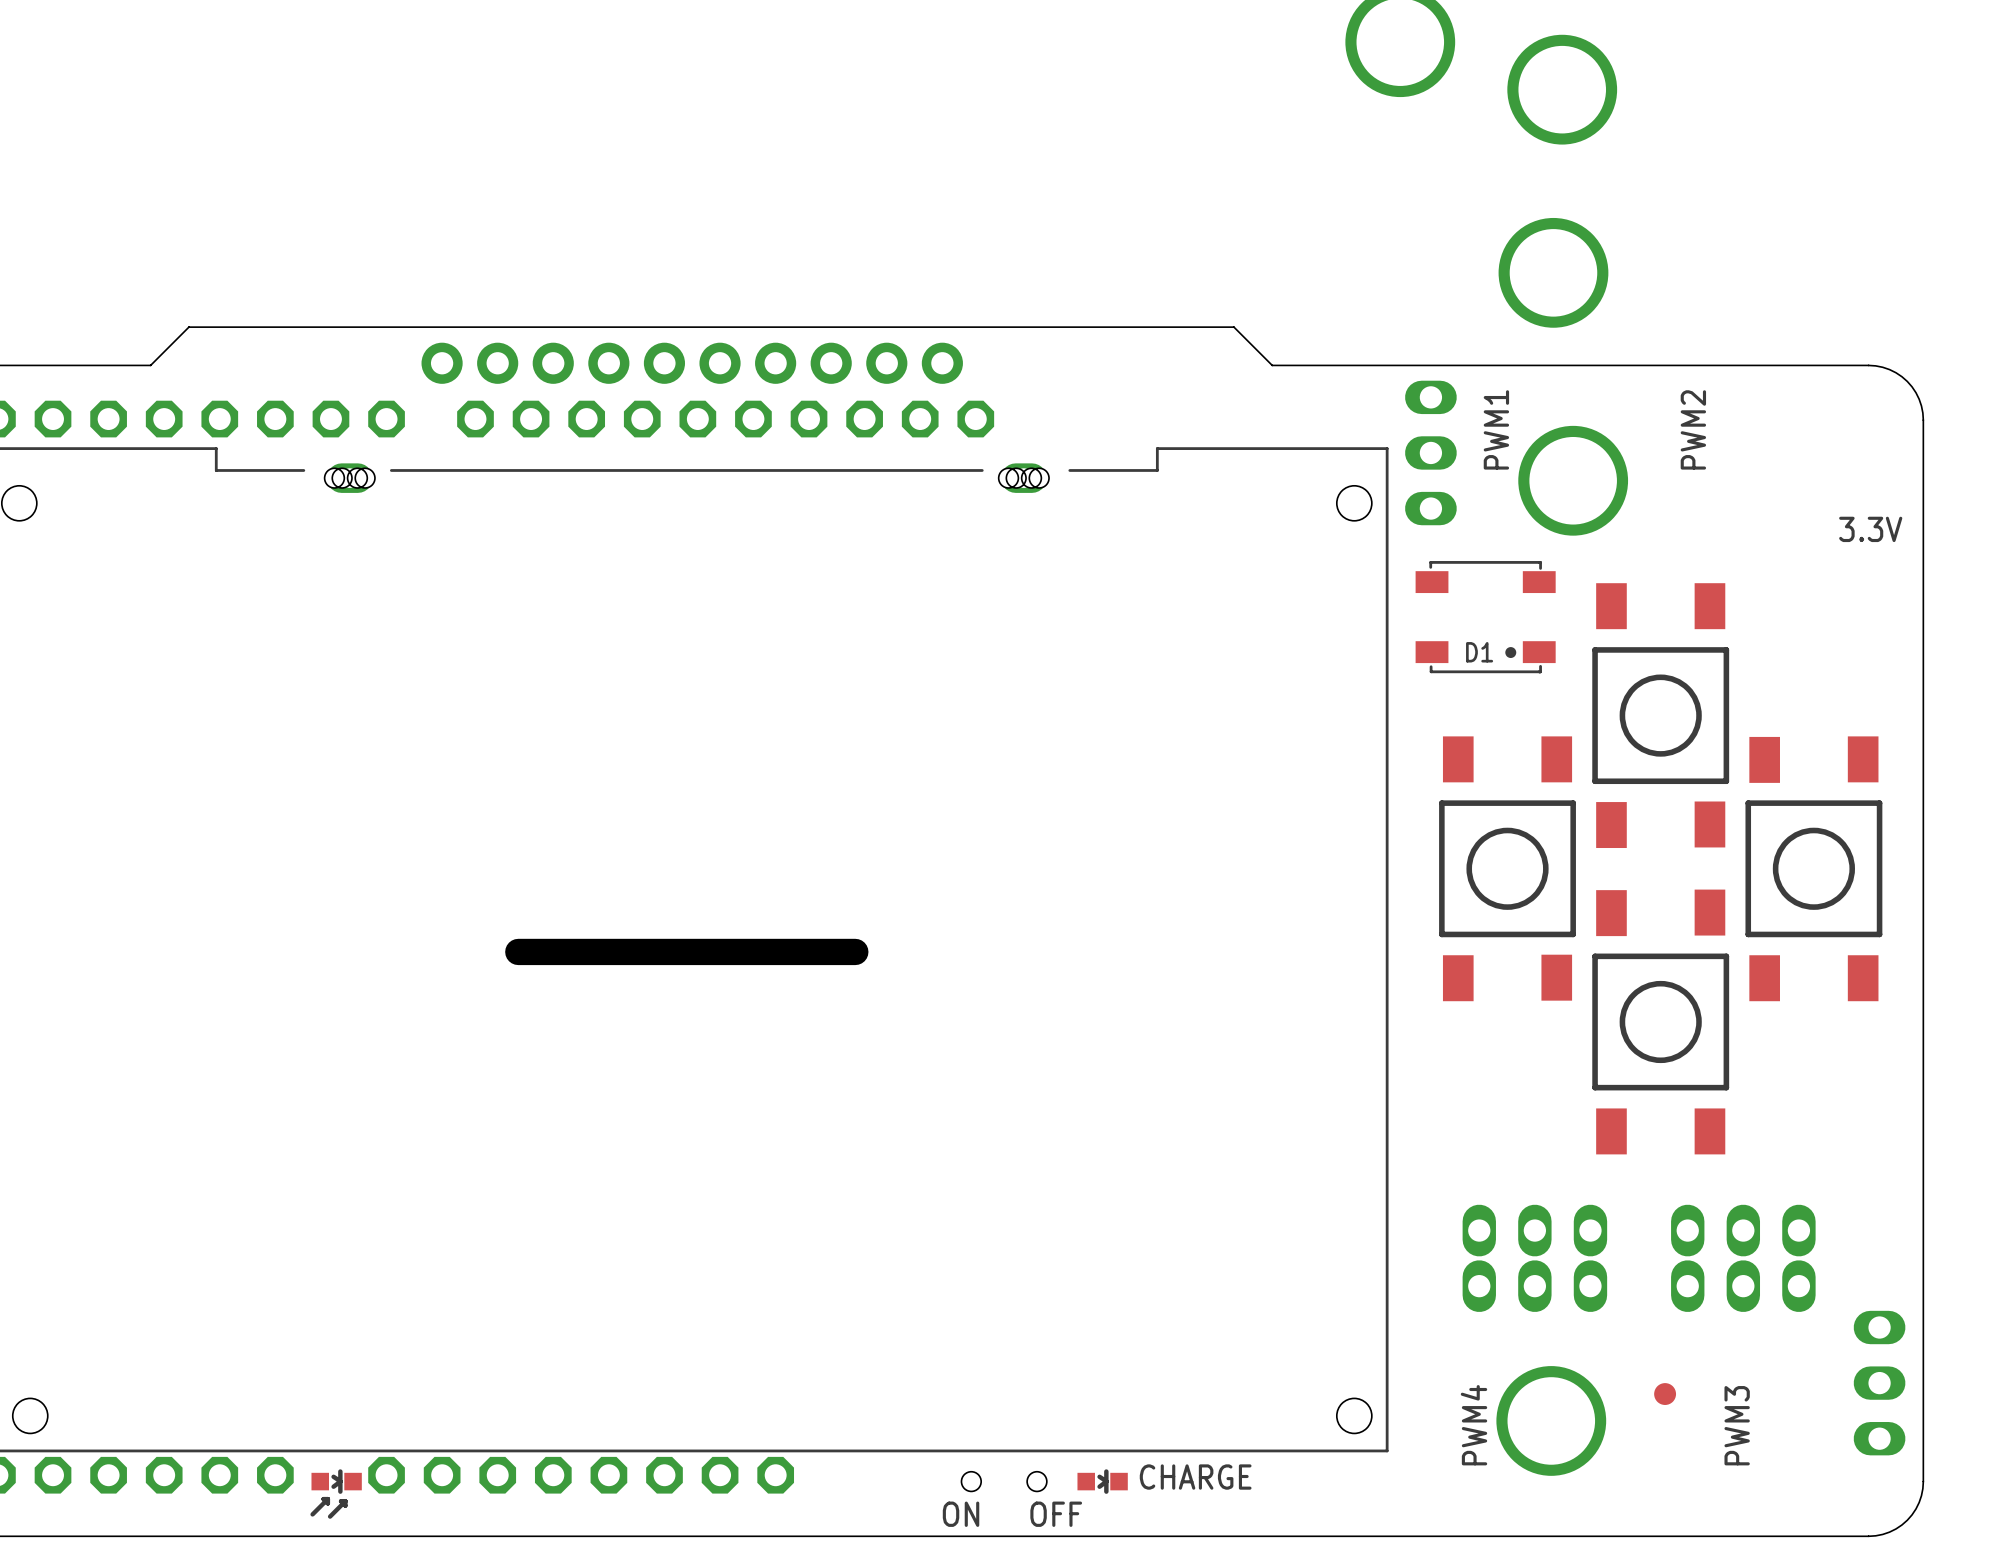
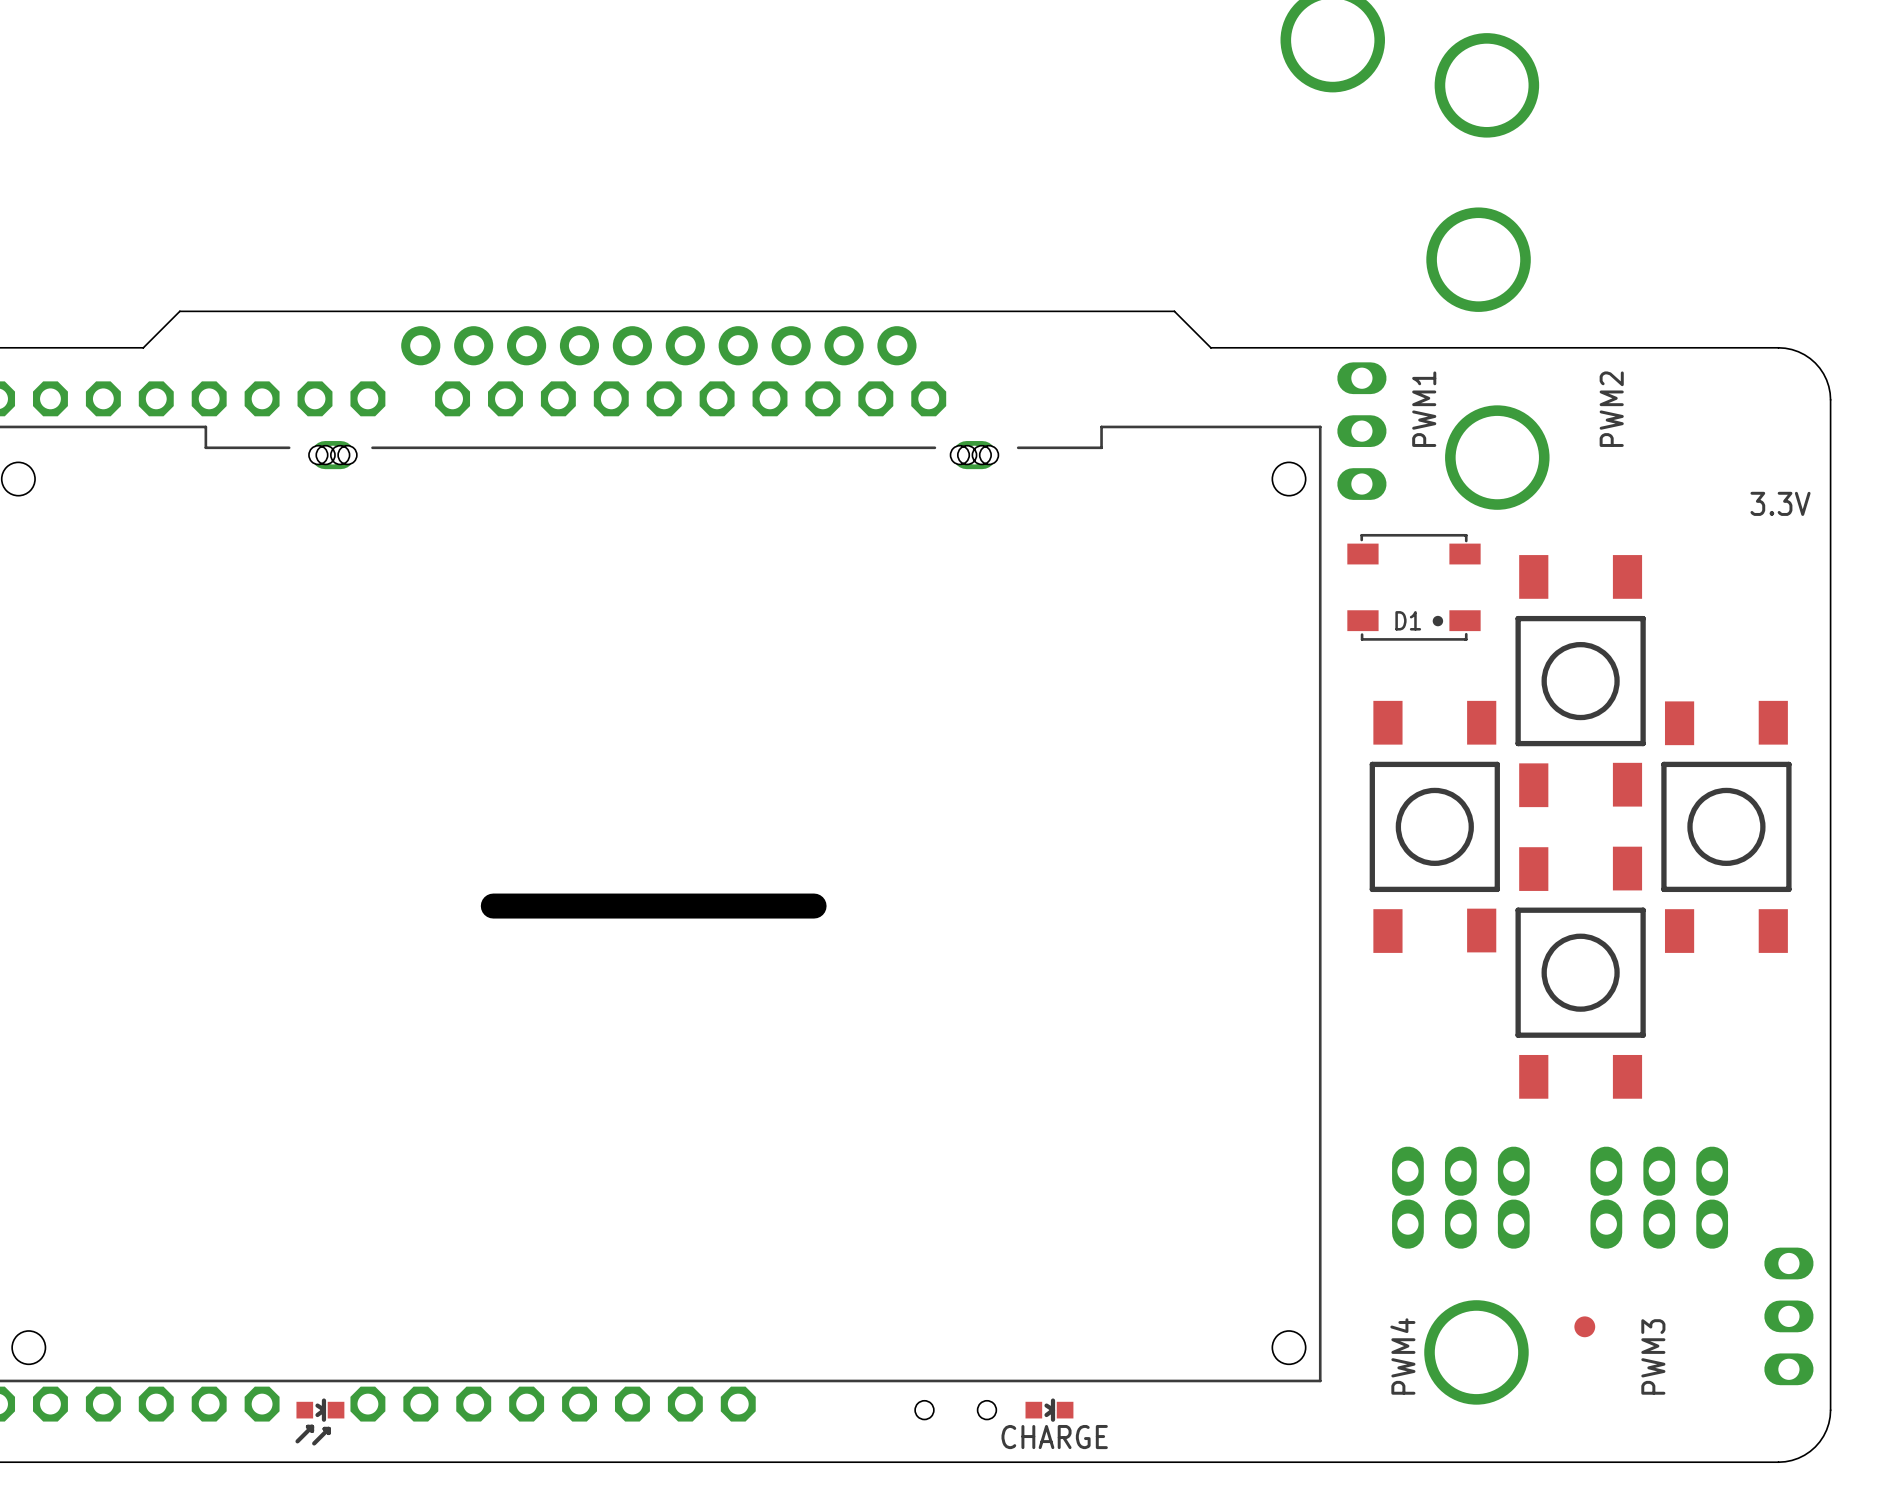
text position: CHARGE (1195, 1477) -> CHARGE (1054, 1437)
text: ON (961, 1514) -> none
text: OFF (1056, 1514) -> none

